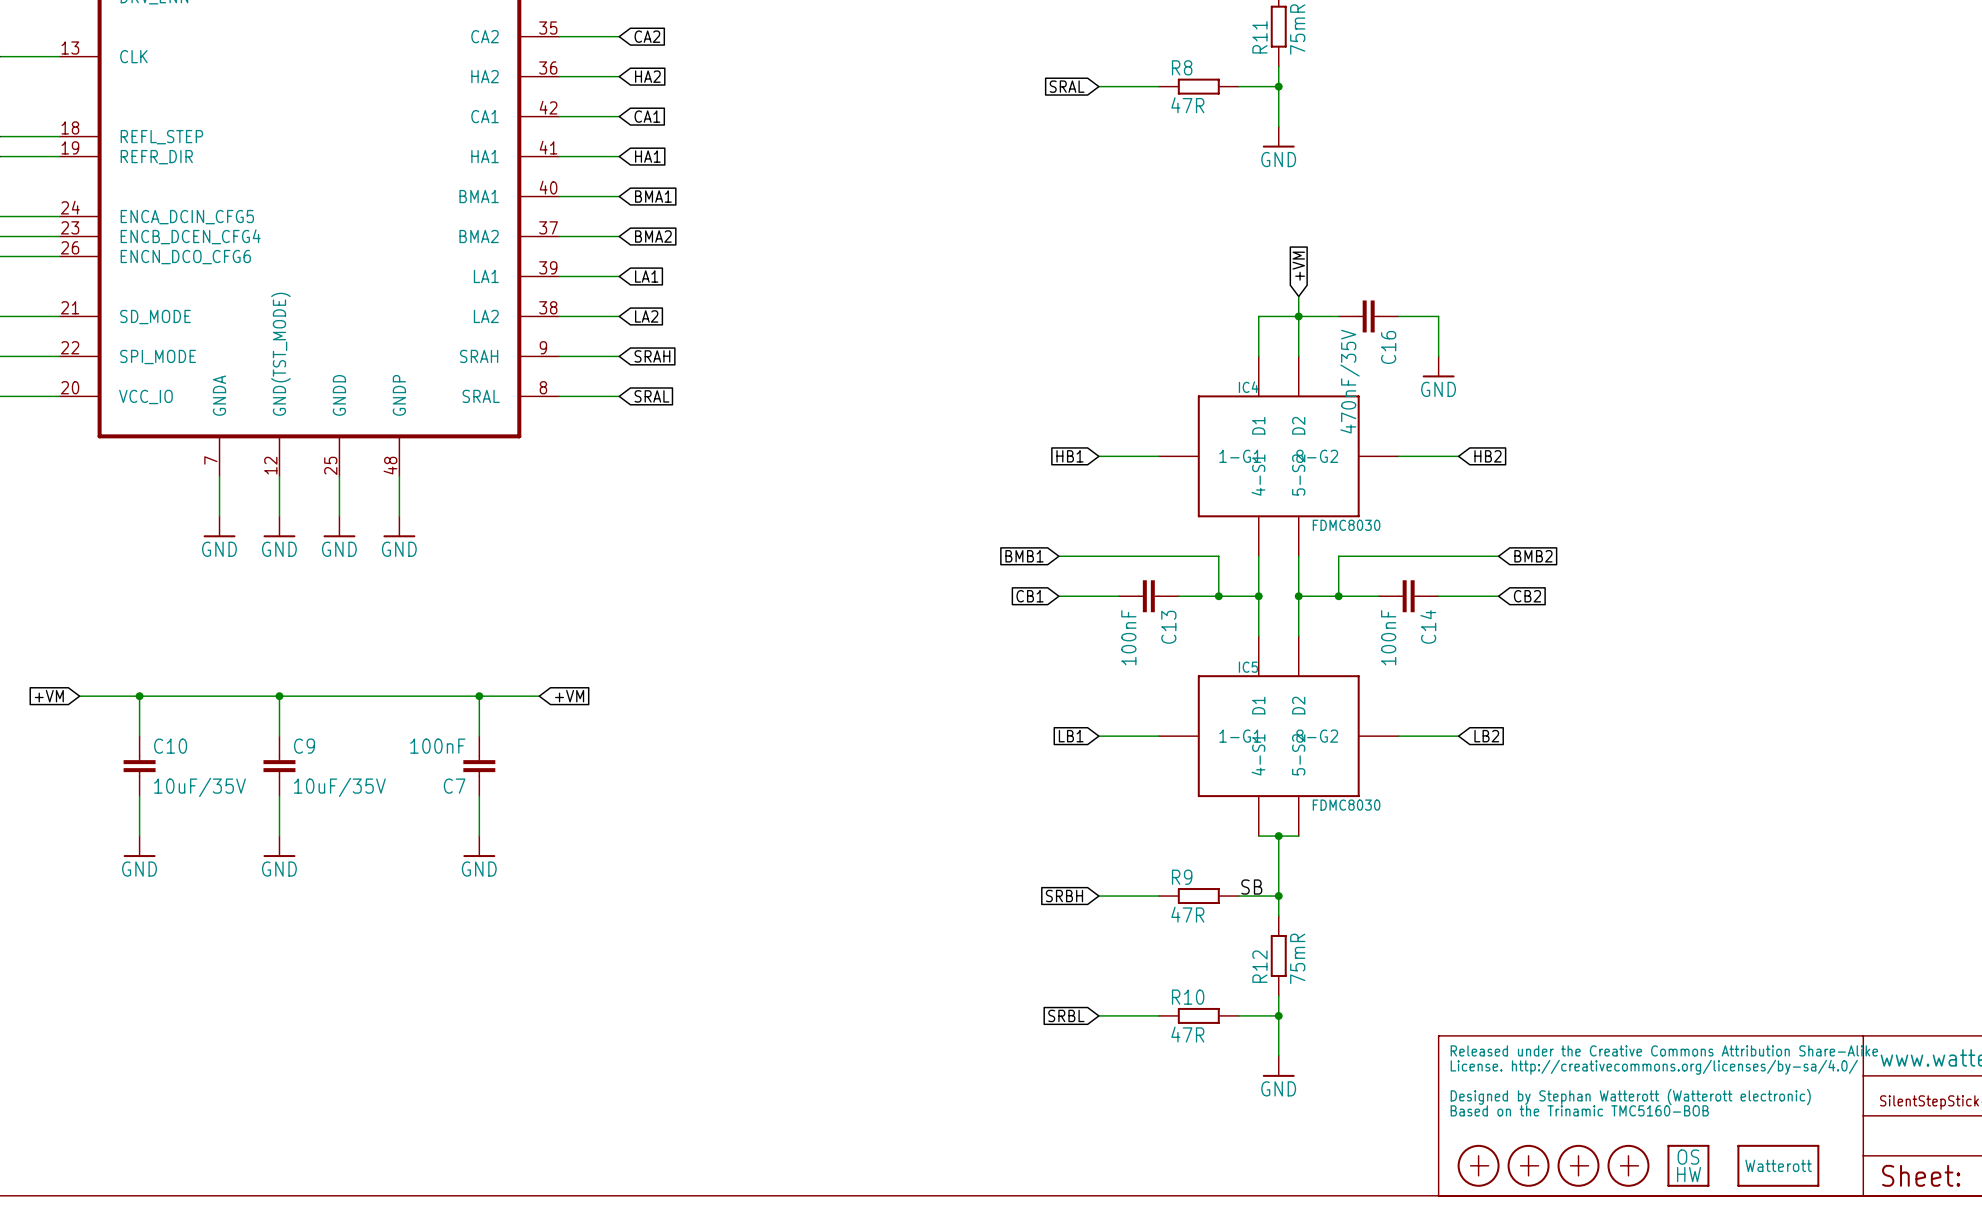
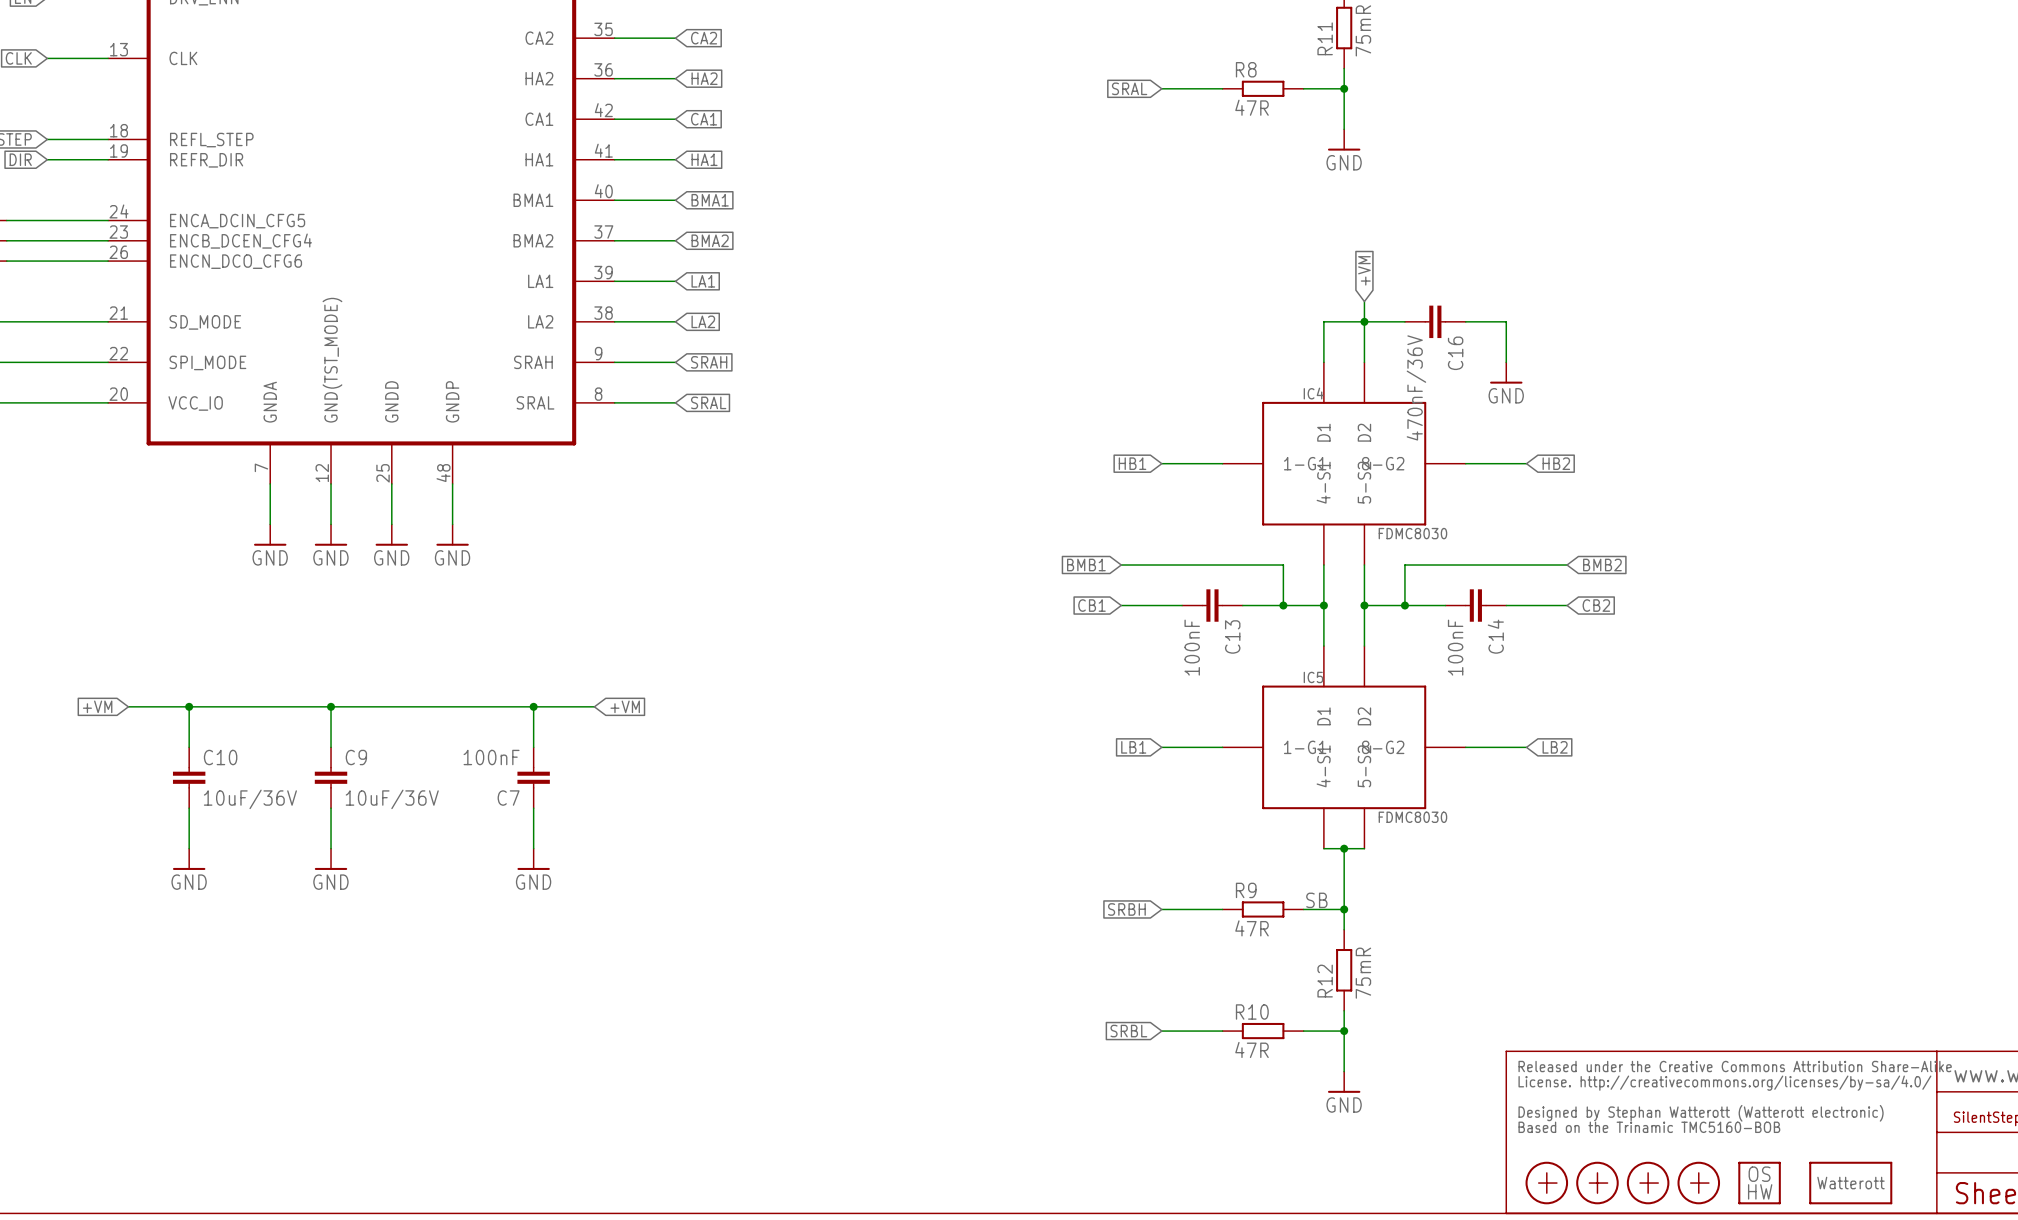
C16 value: 470nF/35V (1350, 381) -> 470nF/36V (1416, 387)
C10 value: 10uF/35V (199, 787) -> 10uF/36V (250, 799)
C9 value: 10uF/35V (339, 787) -> 10uF/36V (392, 799)

